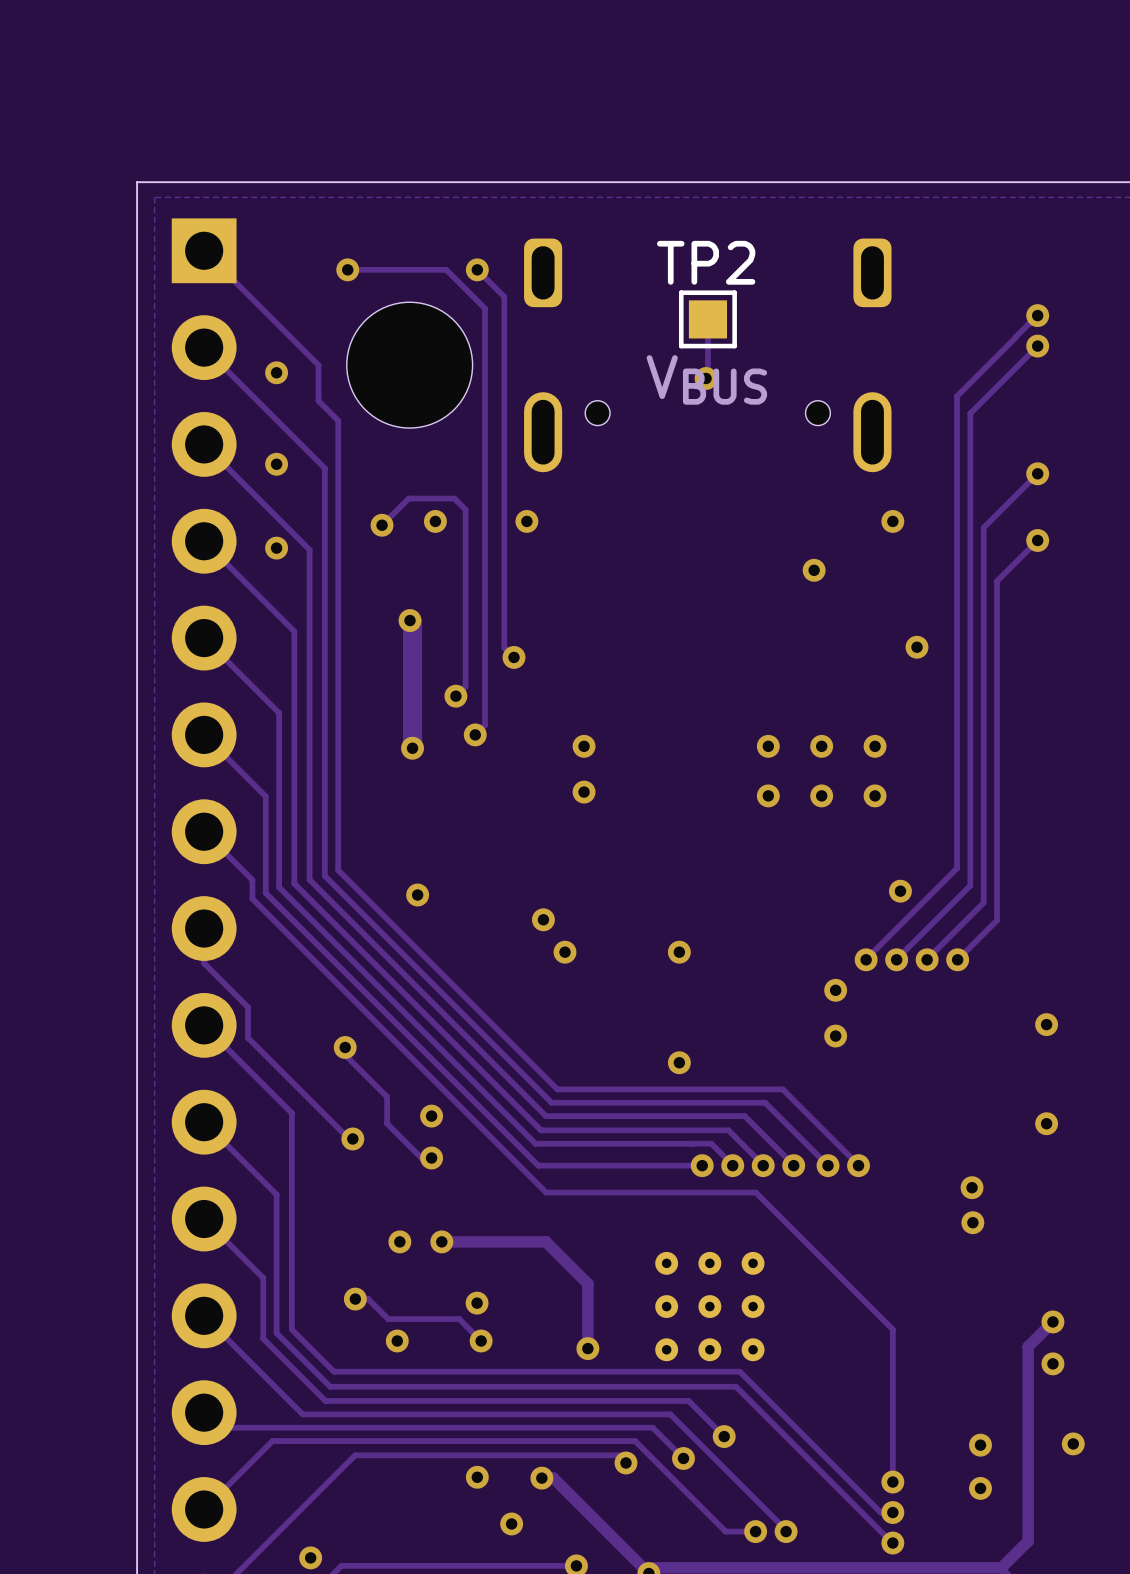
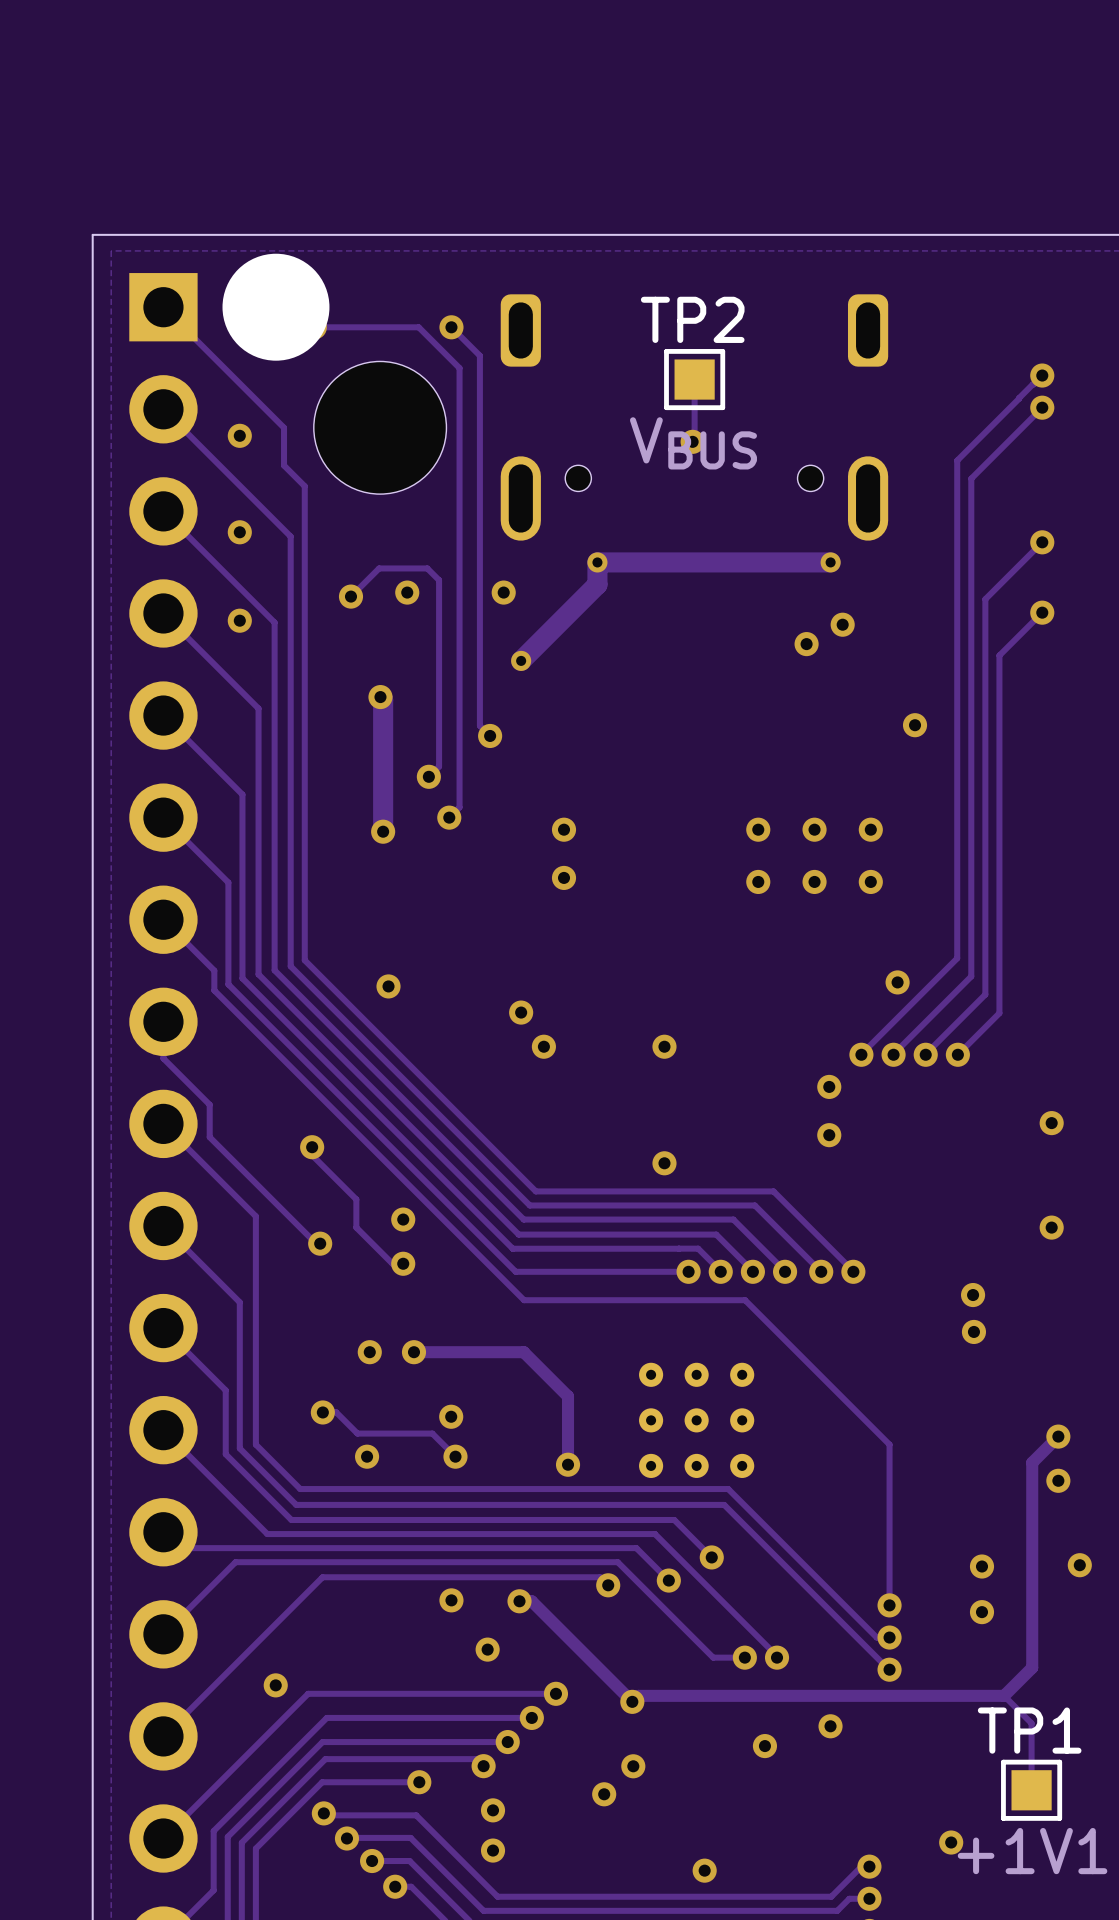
drawing: none -> [222, 253, 330, 361]
via: none -> (597, 562)
track: none -> (830, 562) (597, 562) (597, 584) (521, 660)
via: none -> (830, 562)
via position: (892, 521) -> (842, 624)
via: none -> (521, 660)

